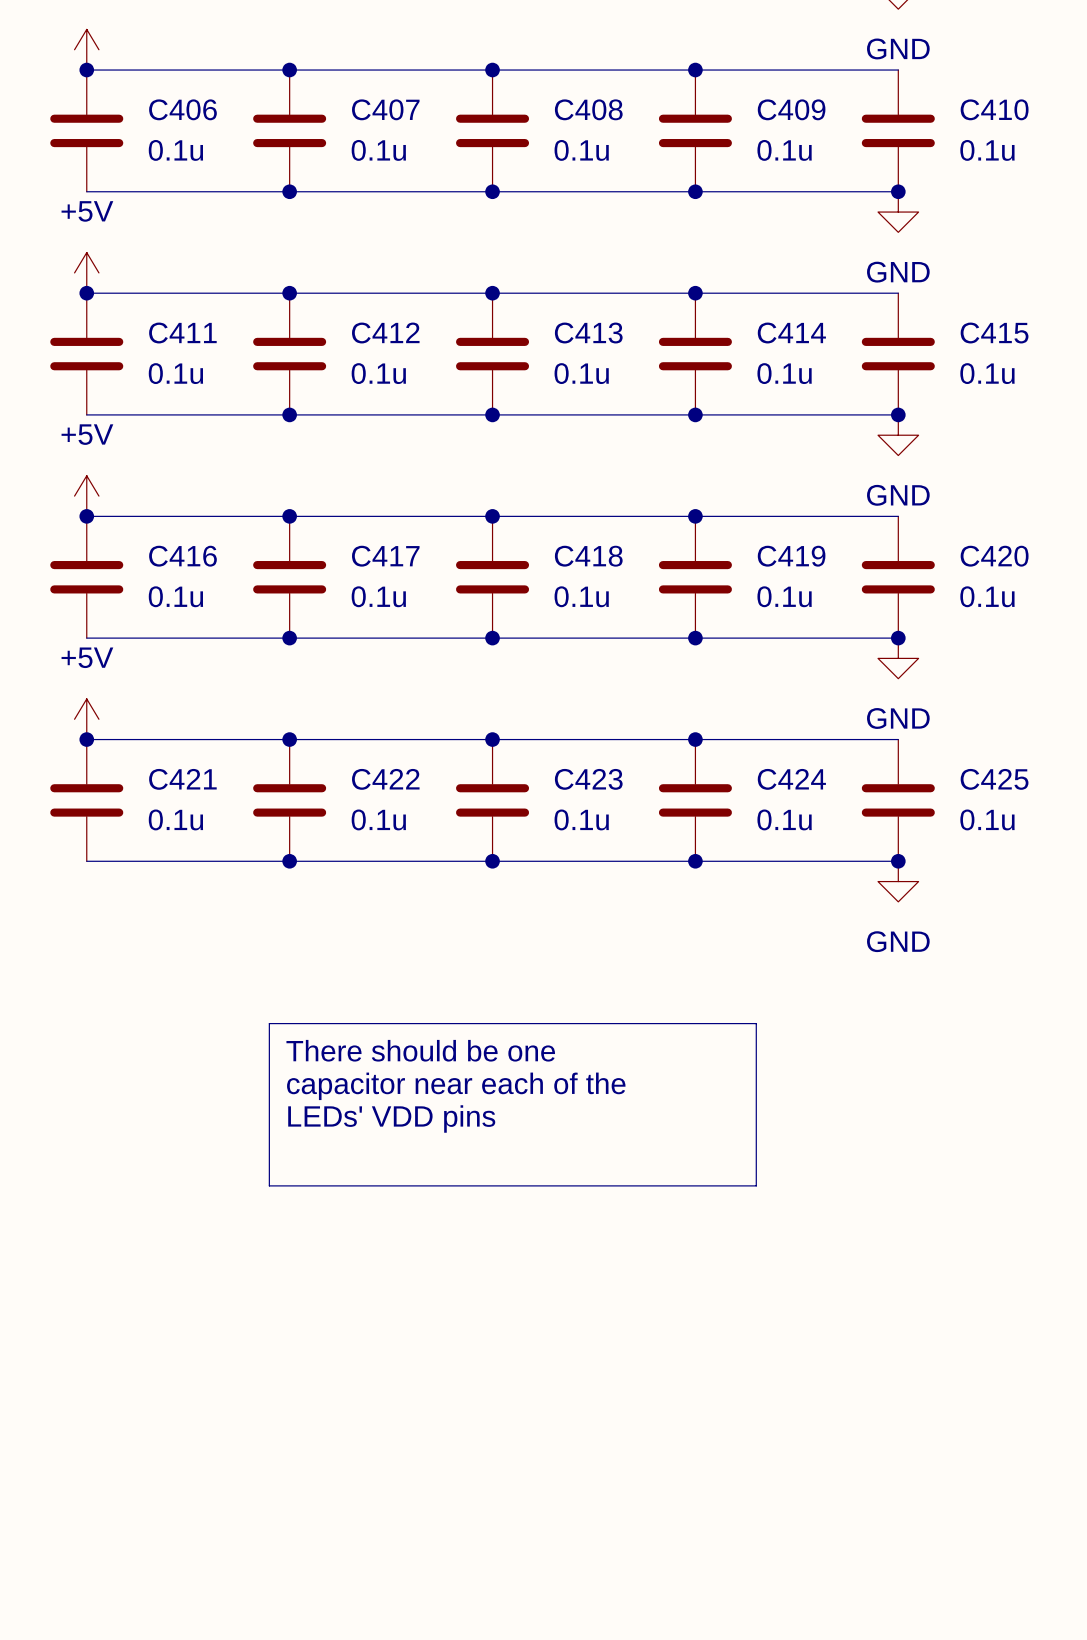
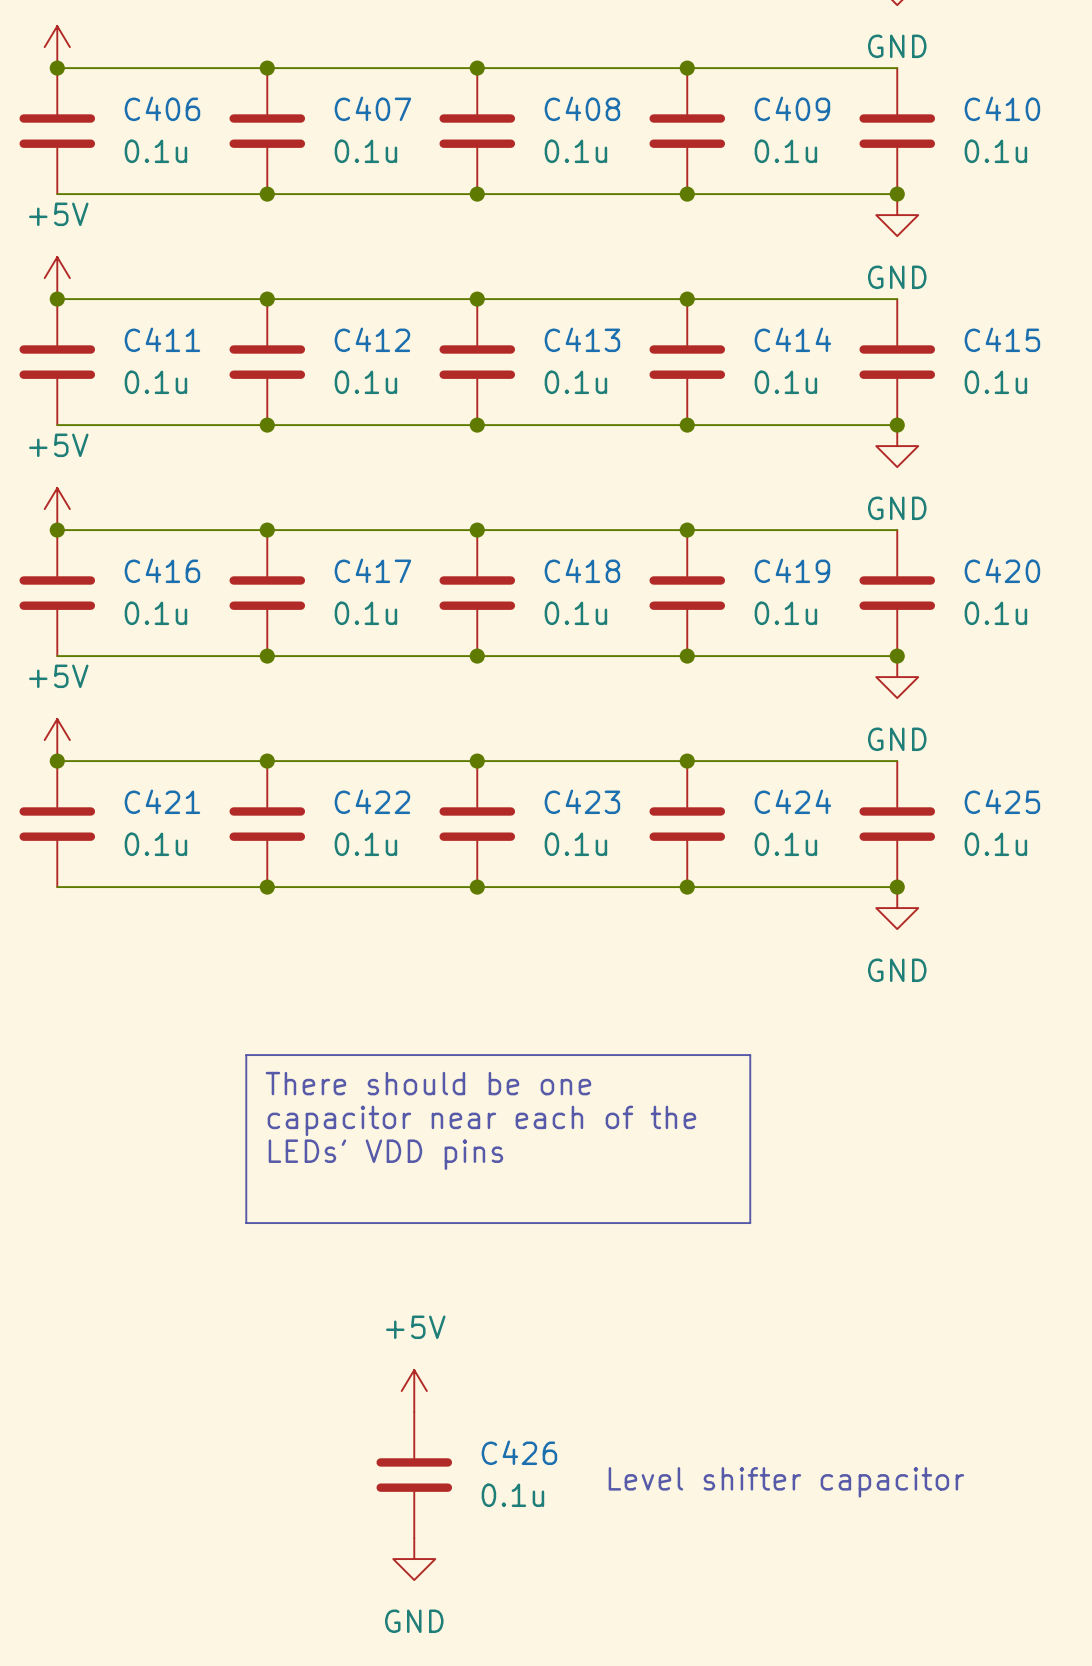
power symbol: none -> +5V (414, 1391)
C426: none -> 0.1u (414, 1475)
text: none -> Level shifter capacitor (786, 1482)
power symbol: none -> GND (414, 1559)

